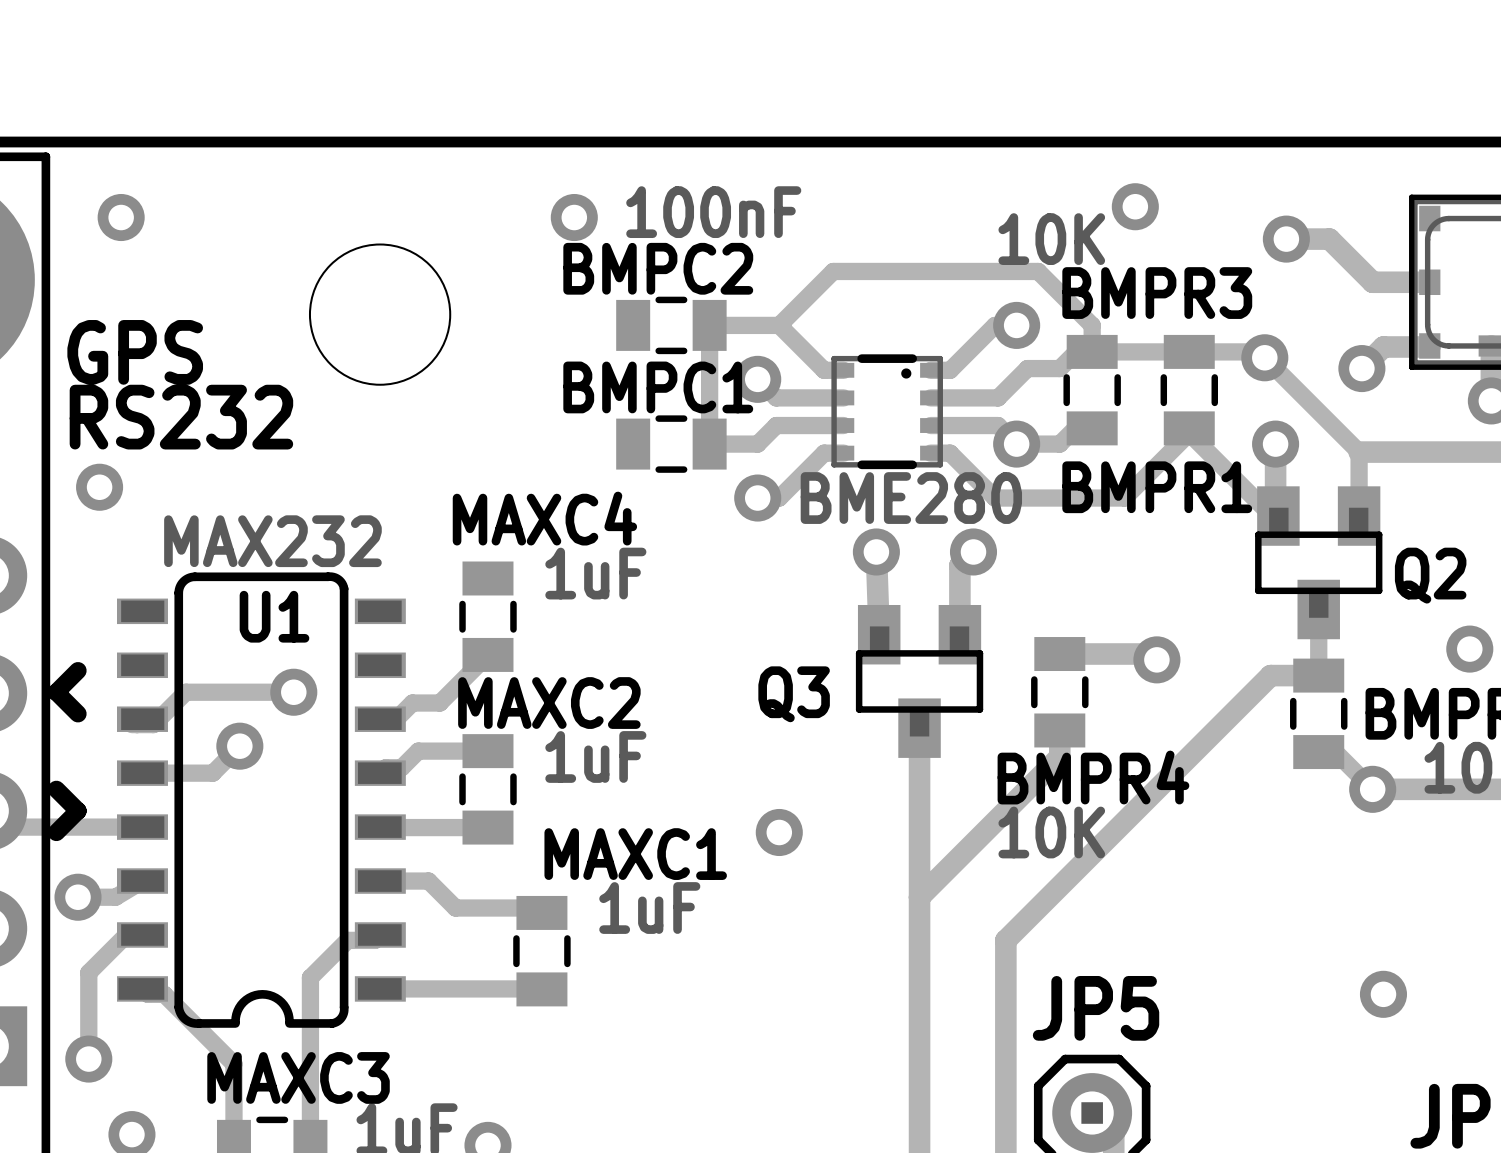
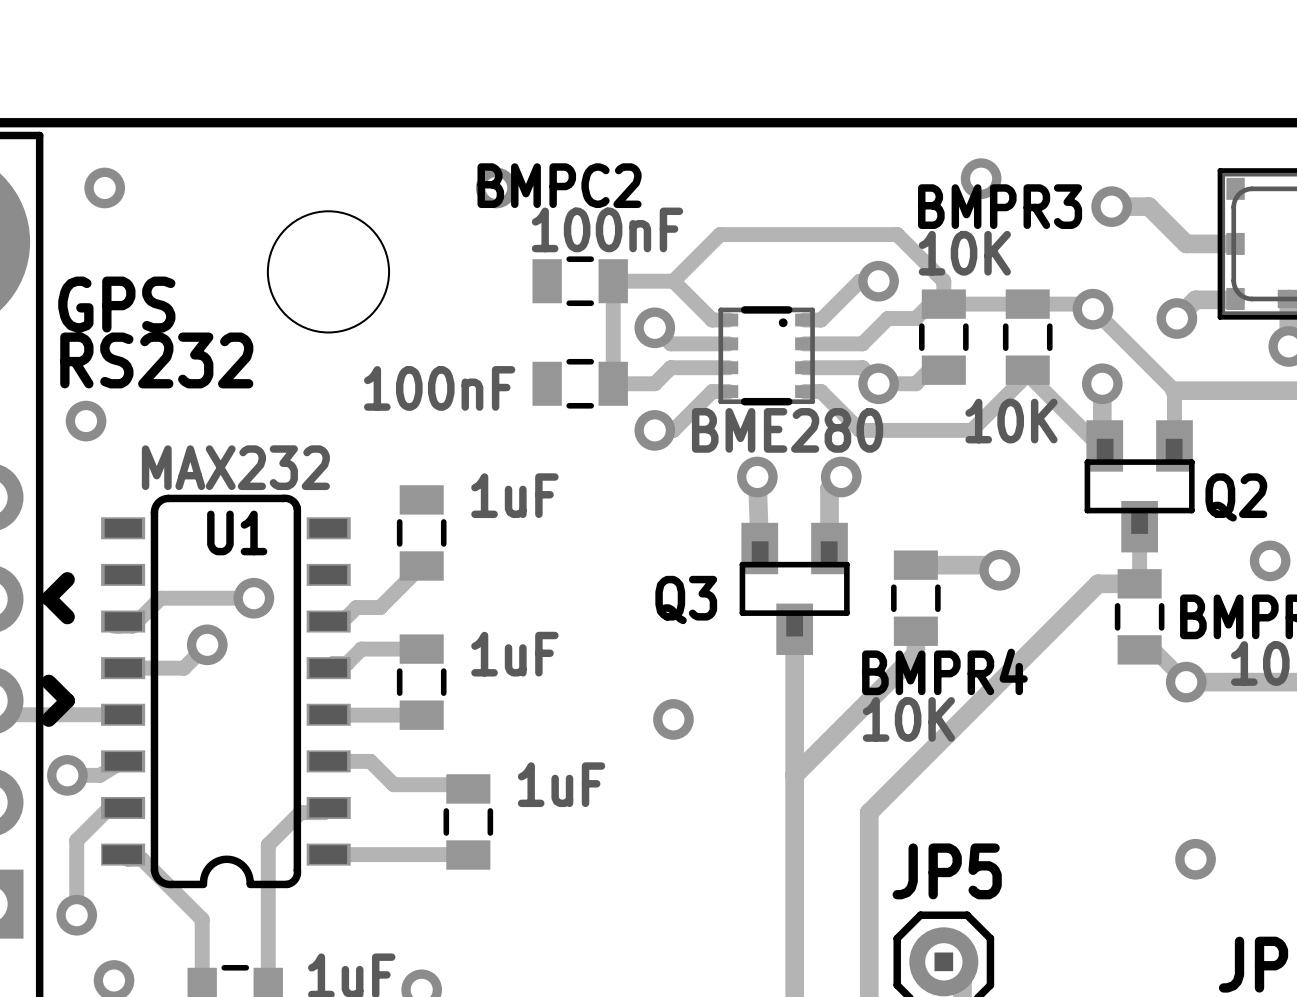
BMPC2 value position: 100nF (713, 212) -> 100nF (607, 229)
BMPR3 value position: 10K (1051, 239) -> 10K (964, 253)
BMPC2 name position: BMPC2 (658, 268) -> BMPC2 (559, 185)
BMPR3 name position: BMPR3 (1157, 293) -> BMPR3 (1000, 206)
BMPC1 name: BMPC1 (658, 387) -> none
BMPC1 value: none -> 100nF (439, 388)
BMPR1 name: BMPR1 (1157, 487) -> none
BMPR1 value: none -> 10K (1011, 421)
MAXC4 name: MAXC4 (544, 518) -> none
MAXC2 name: MAXC2 (549, 703) -> none
MAXC1 name: MAXC1 (635, 854) -> none
MAXC3 name: MAXC3 (298, 1077) -> none

